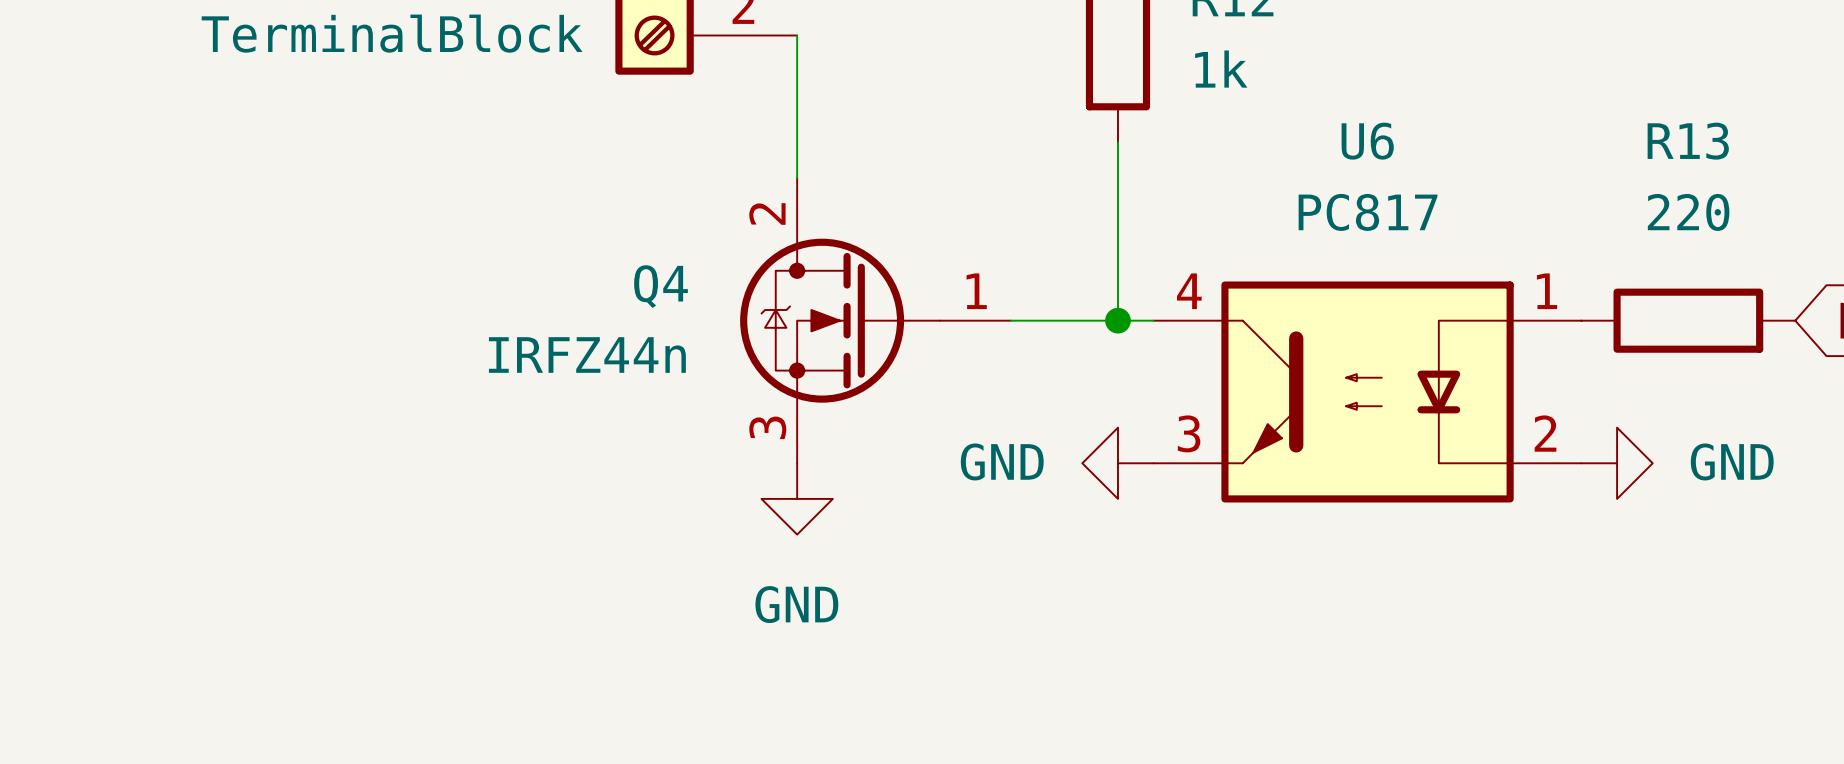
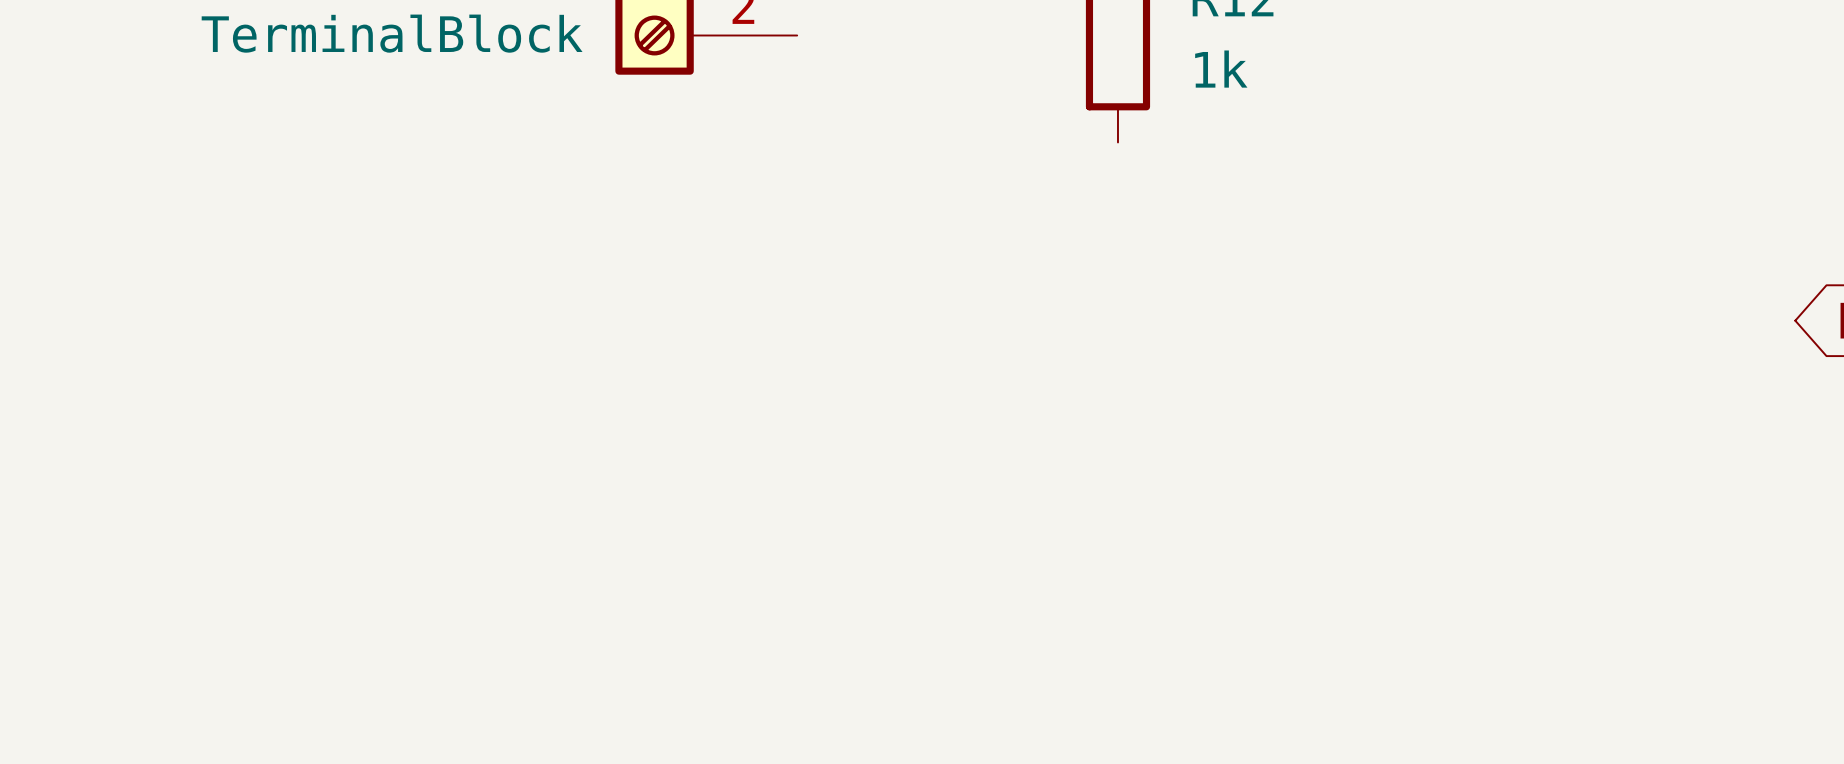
wire: (797, 35) (797, 178) -> none
wire: (1117, 142) (1117, 320) -> none
Q4: IRFZ44n (875, 320) -> none
wire: (1011, 320) (1153, 320) -> none
junction: (1117, 320) -> none
R13: 220 (1688, 320) -> none
U6: PC817 (1367, 391) -> none
power symbol: GND (1117, 463) -> none
power symbol: GND (1617, 463) -> none
power symbol: GND (797, 498) -> none

